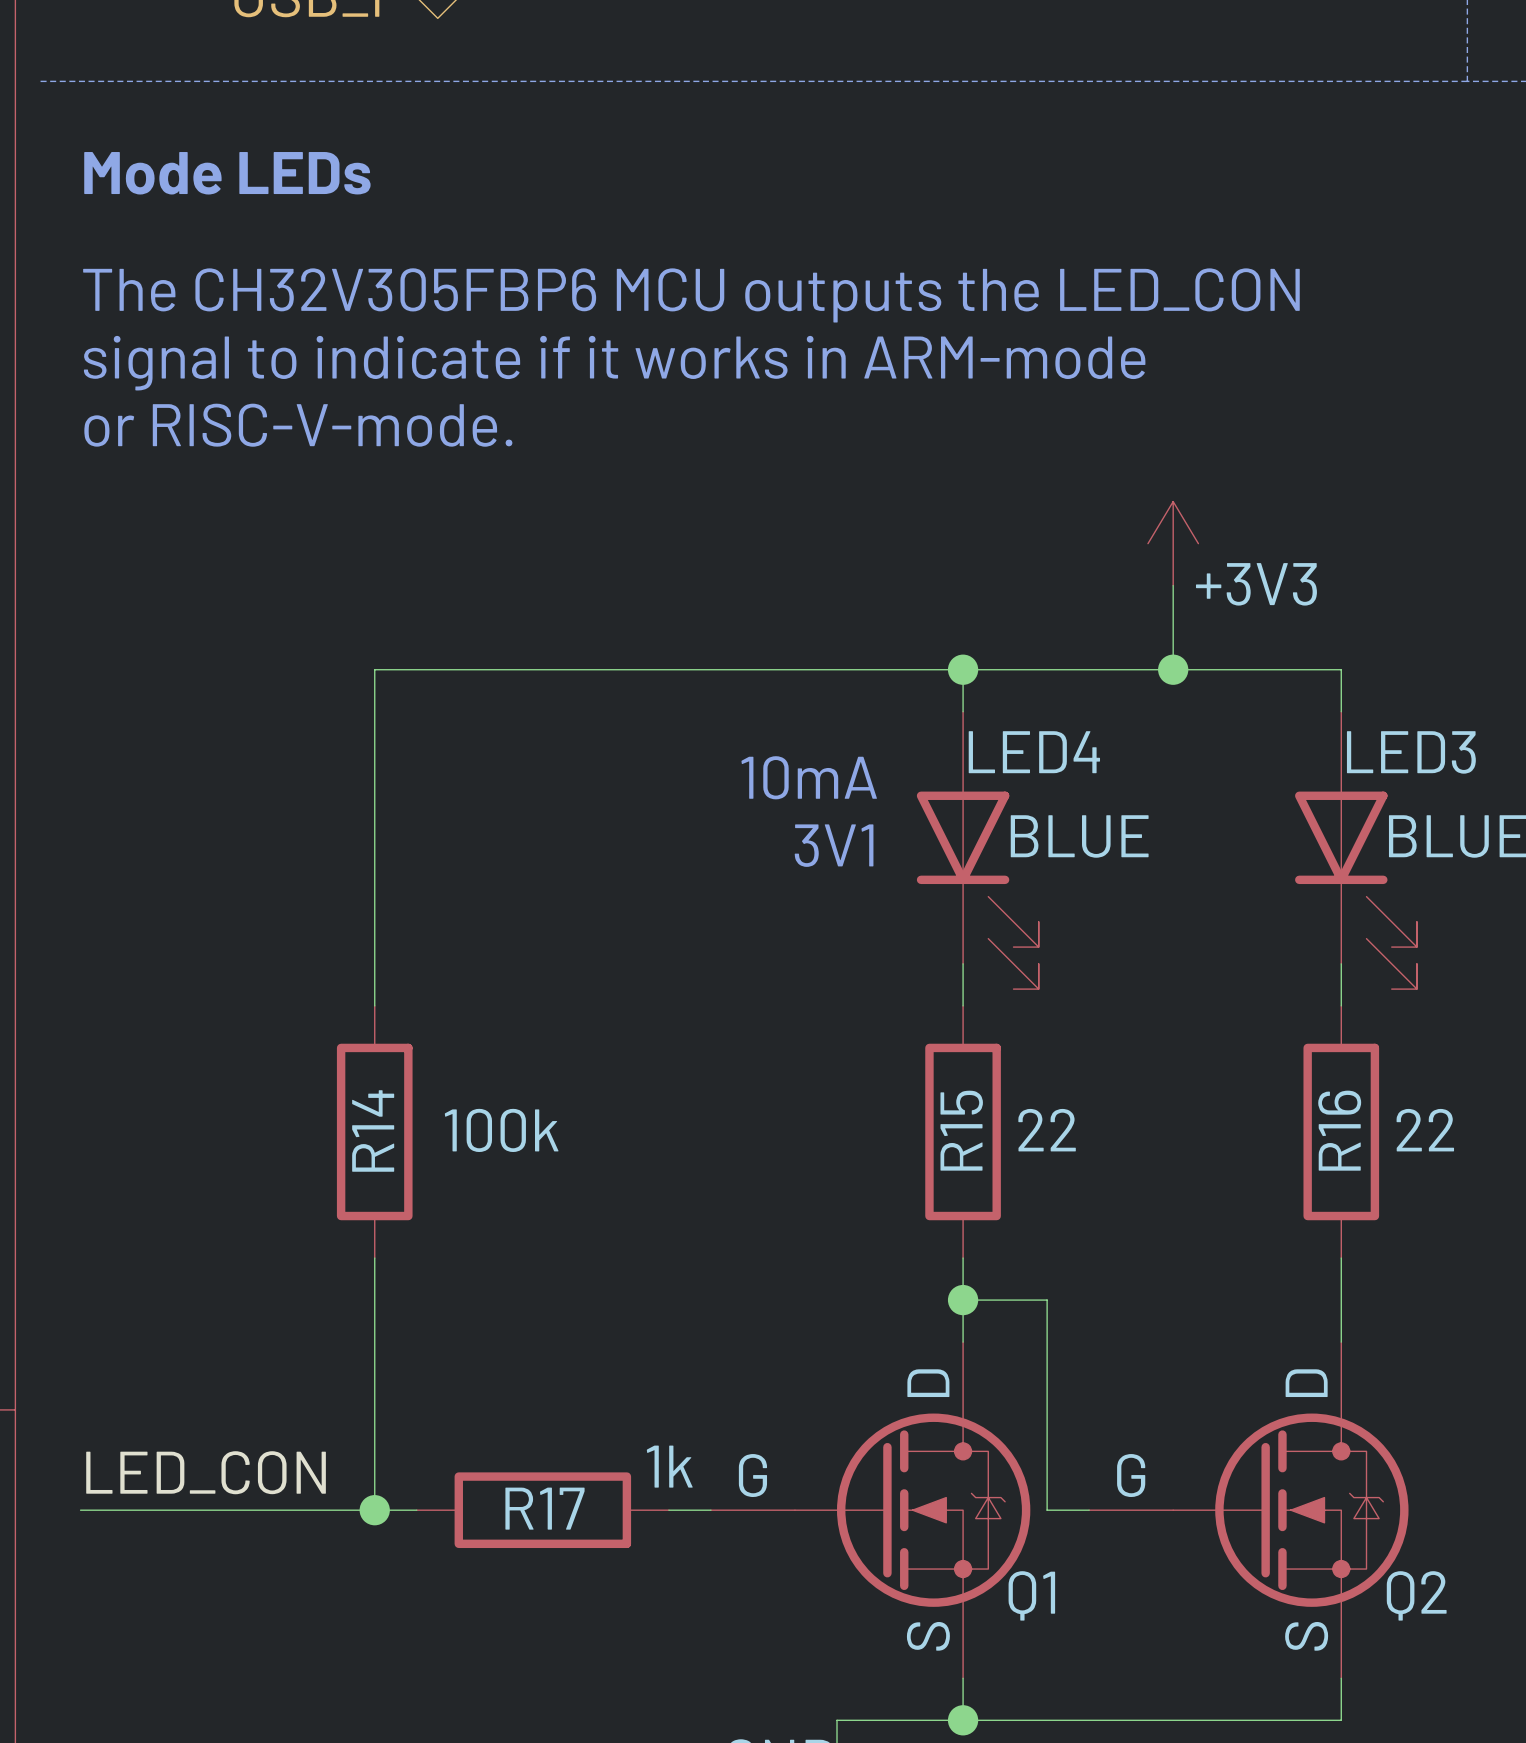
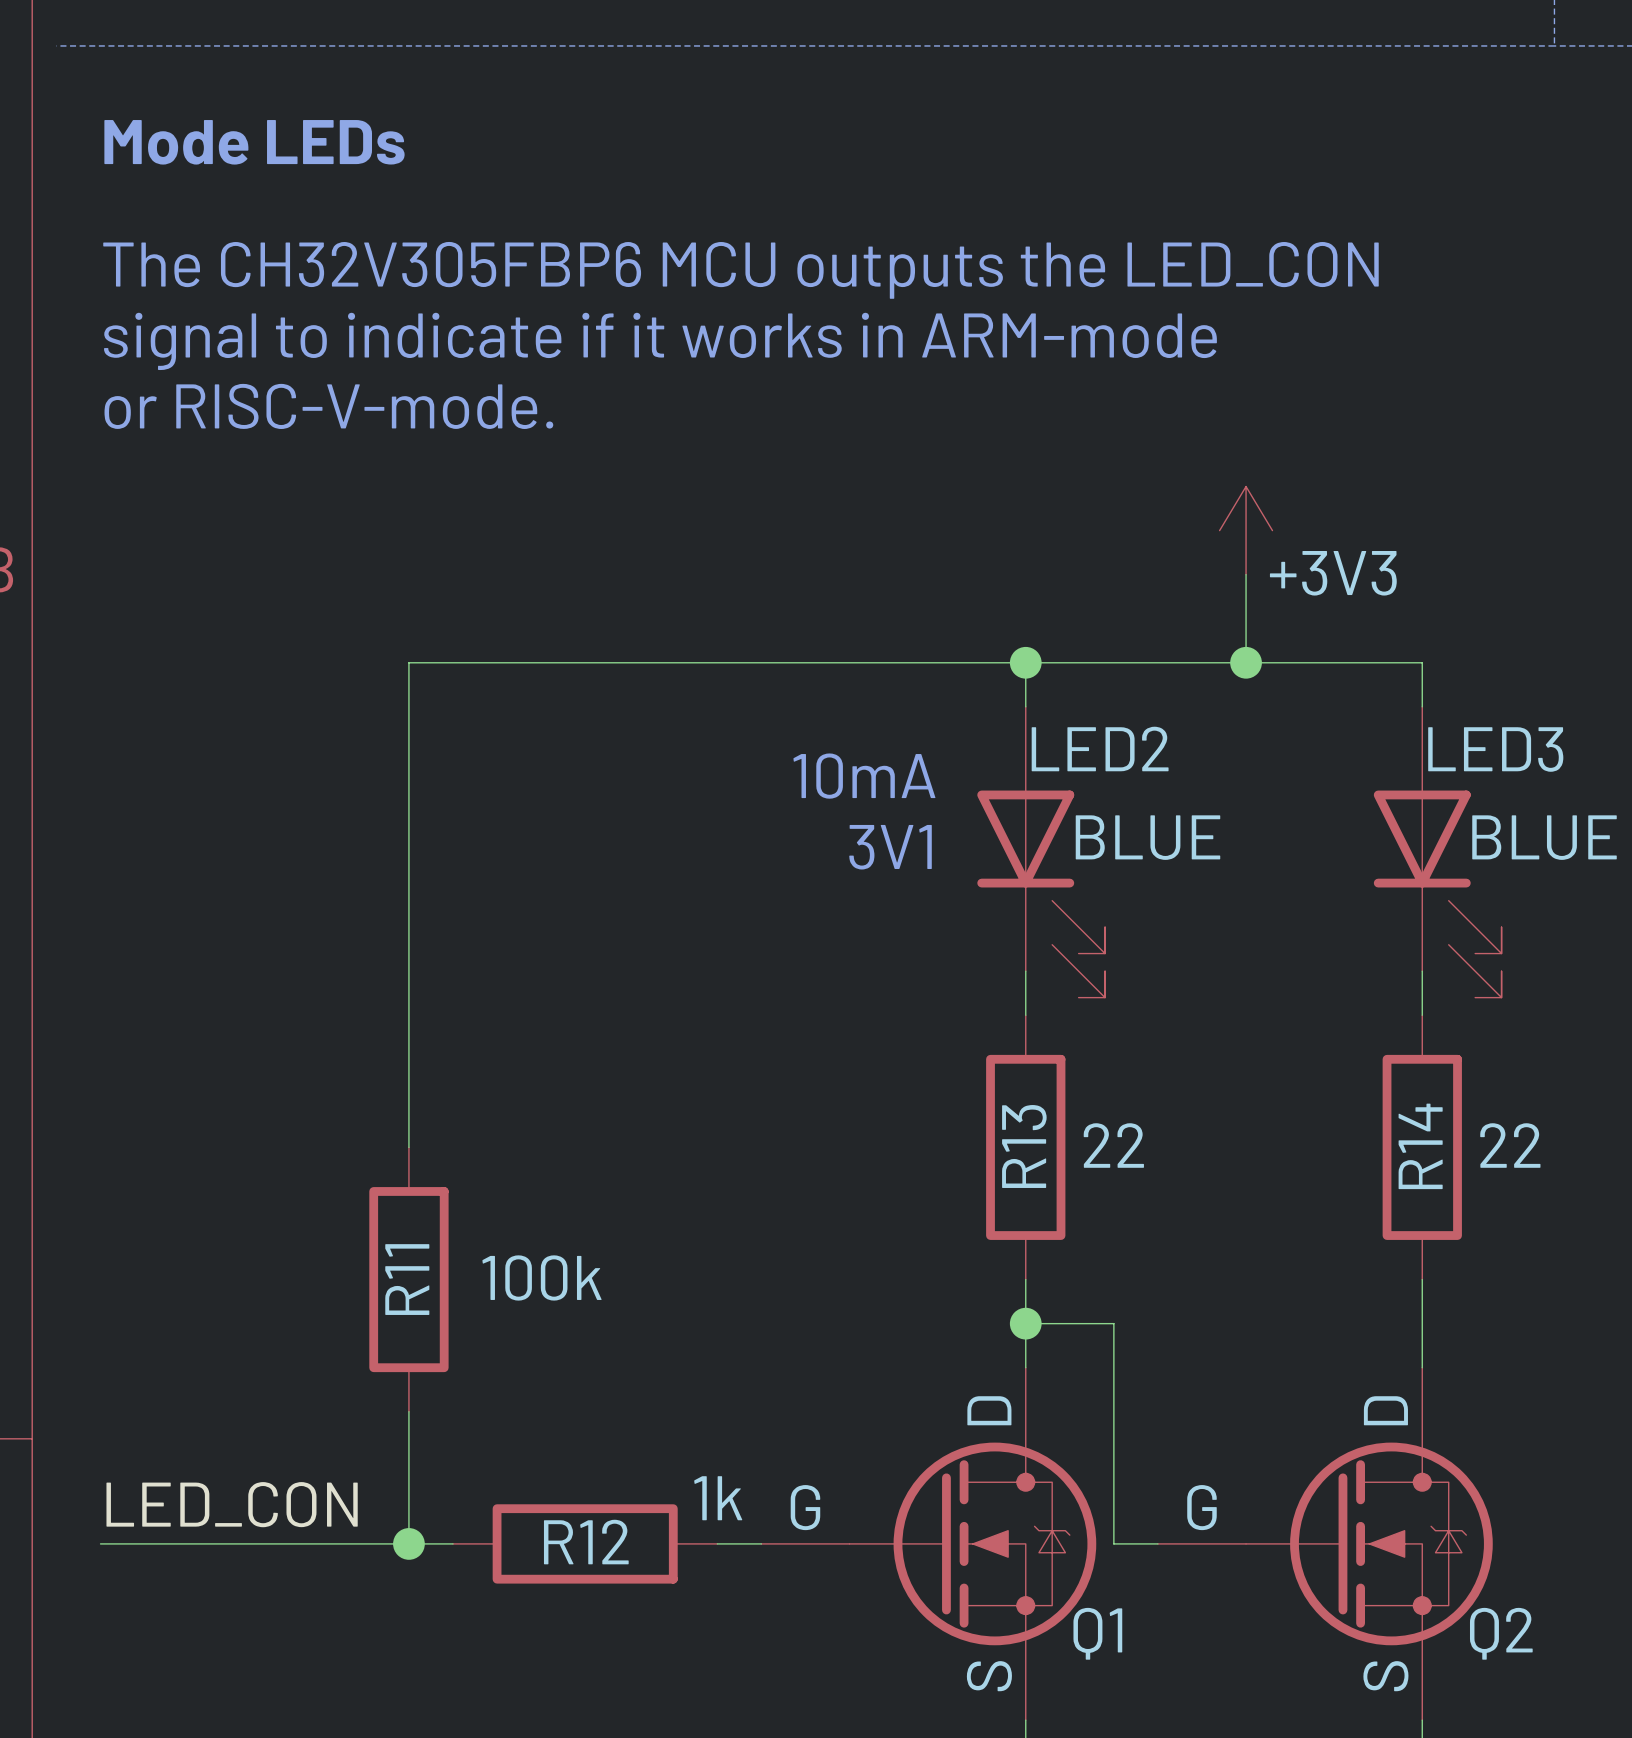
LED4 name: LED4 (1034, 752) -> LED2 (1100, 749)
R15 name: R15 (961, 1130) -> R13 (1024, 1146)
R16 name: R16 (1339, 1130) -> R14 (1420, 1146)
R14: 100k (374, 1131) -> none
wire: (374, 1258) (374, 1384) -> (408, 1015) (408, 1147)
R11: none -> 100k (408, 1279)
R17 name: R17 (544, 1508) -> R12 (586, 1542)

